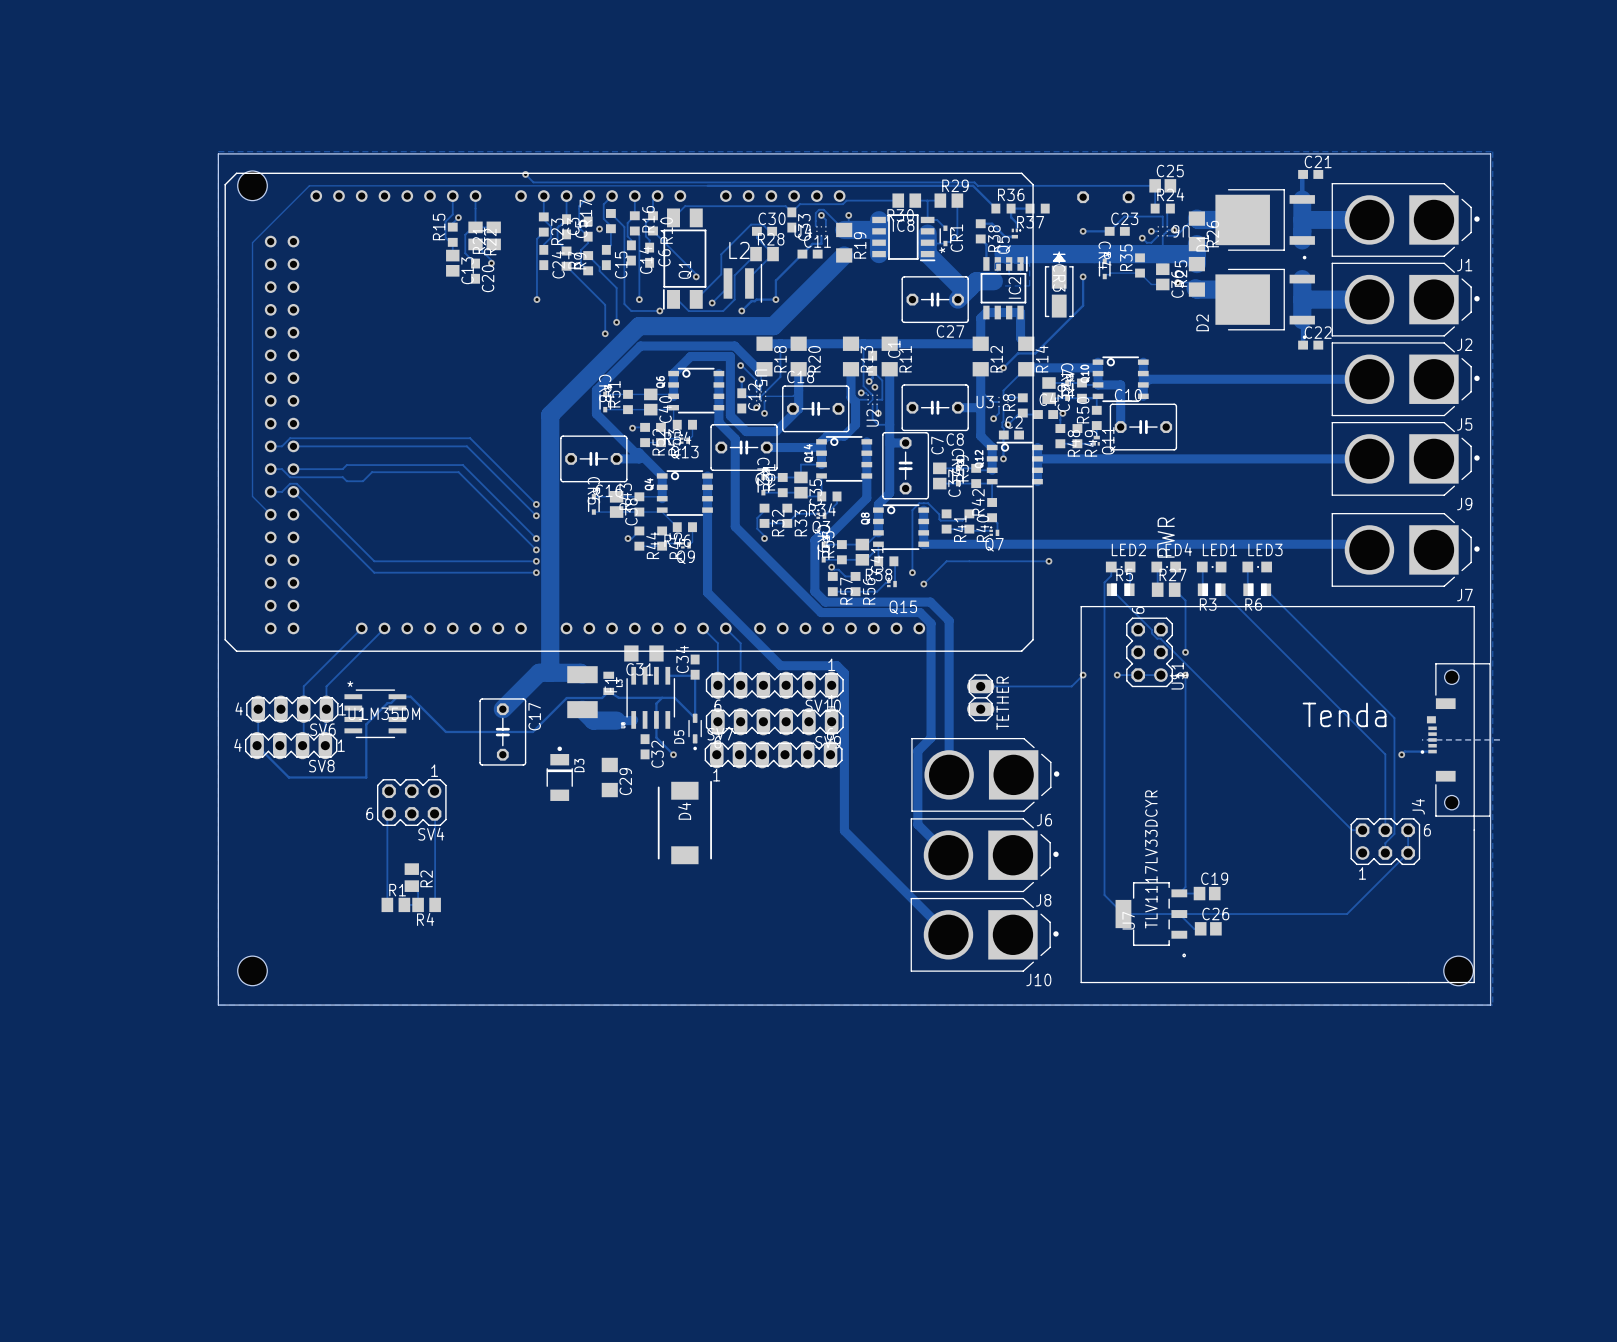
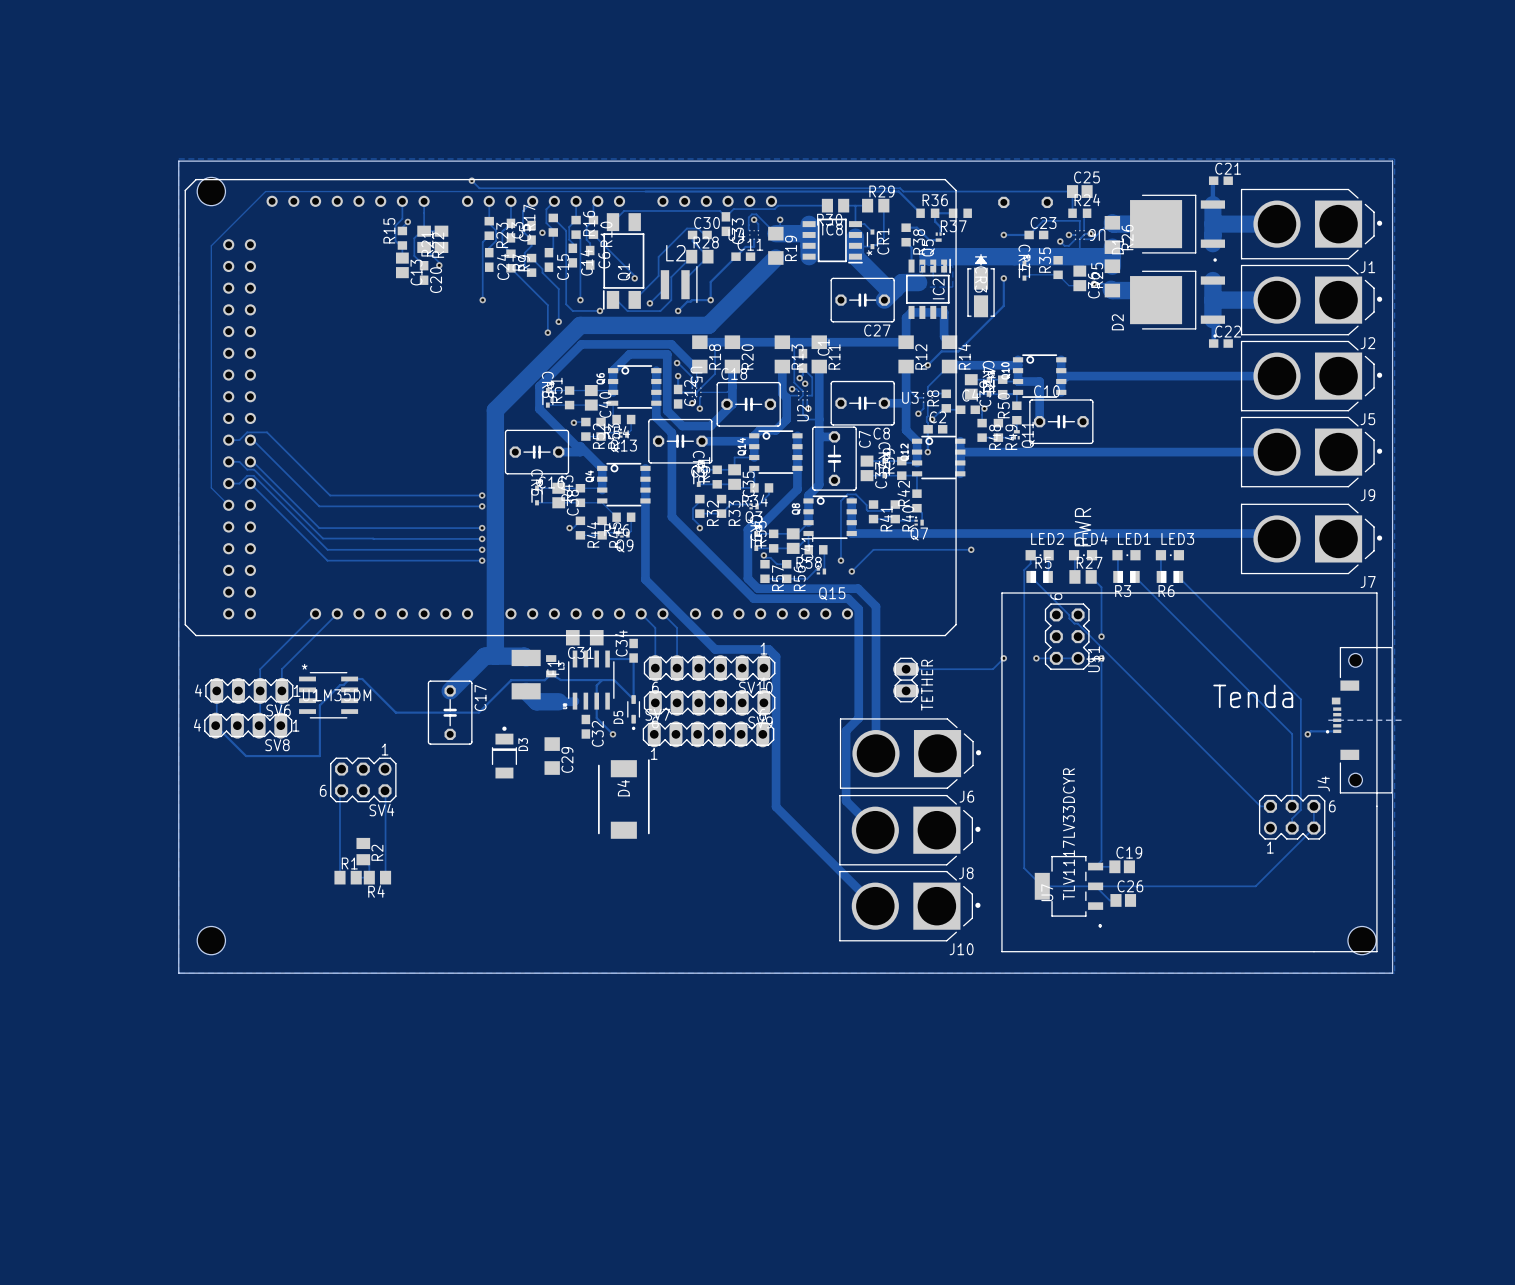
track: (310, 438) (470, 438) (536, 504) -> (267, 432) (330, 495) (482, 495)
track: (296, 446) (466, 446) (536, 515) -> (253, 440) (319, 506) (482, 506)
track: (296, 469) (342, 469) (346, 465) (462, 465) (536, 538) -> (253, 461) (319, 528) (482, 528)
track: (297, 477) (342, 477) (346, 481) (363, 481) (372, 472) (458, 472) (536, 549) -> (254, 469) (323, 538) (482, 538)

